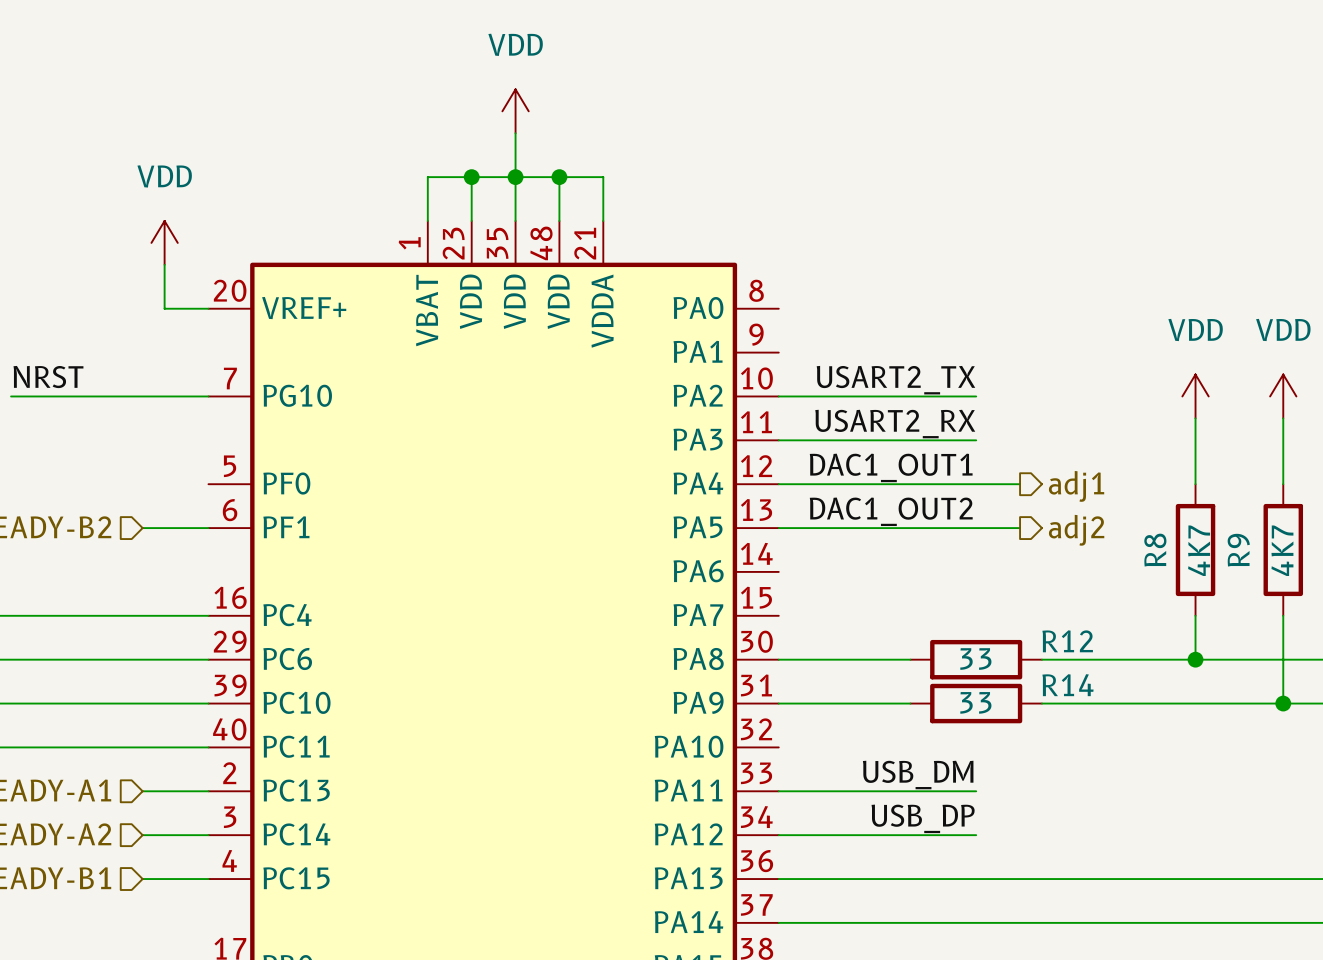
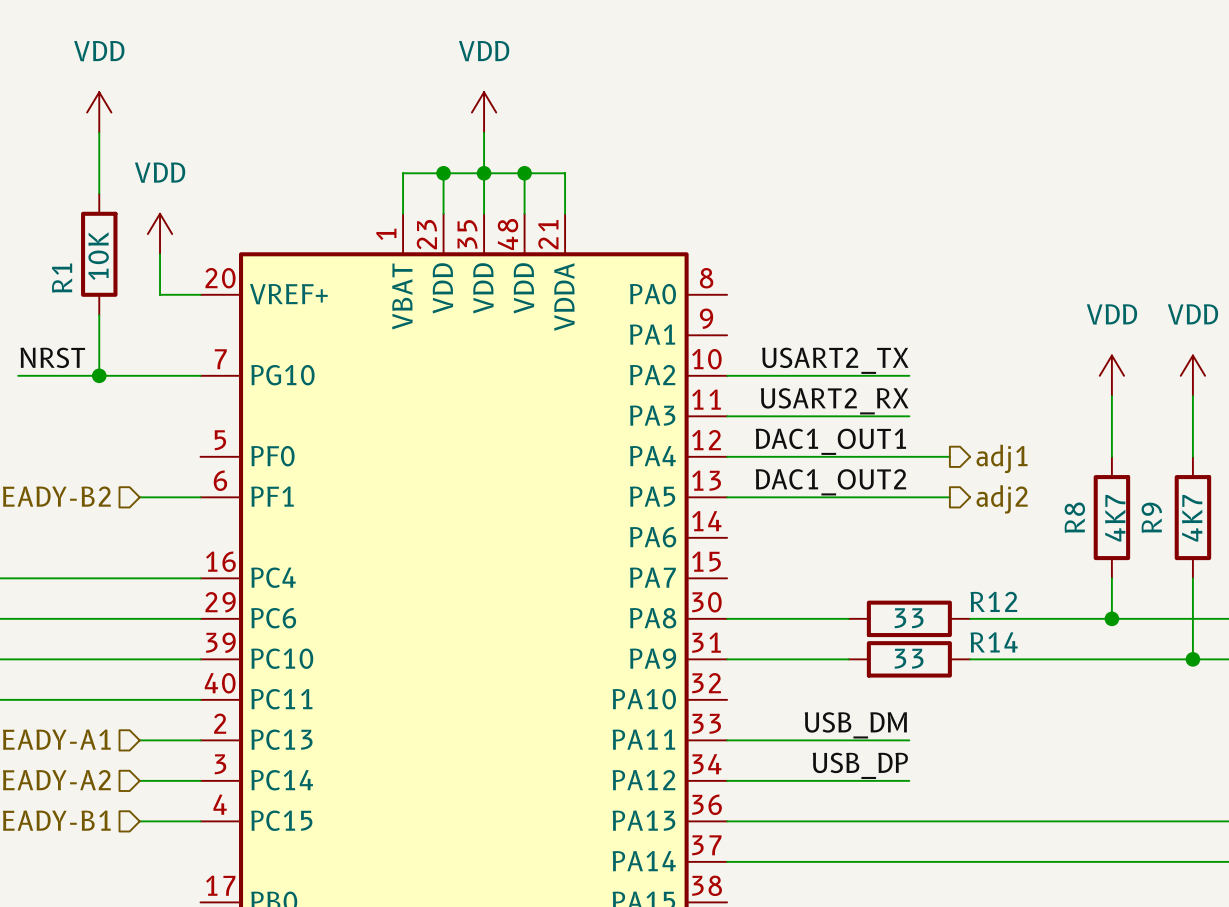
power symbol: none -> VDD (99, 112)
wire: none -> (99, 132) (99, 193)
R1: none -> 10K (99, 254)
wire: none -> (99, 315) (99, 375)
junction: none -> (99, 375)

